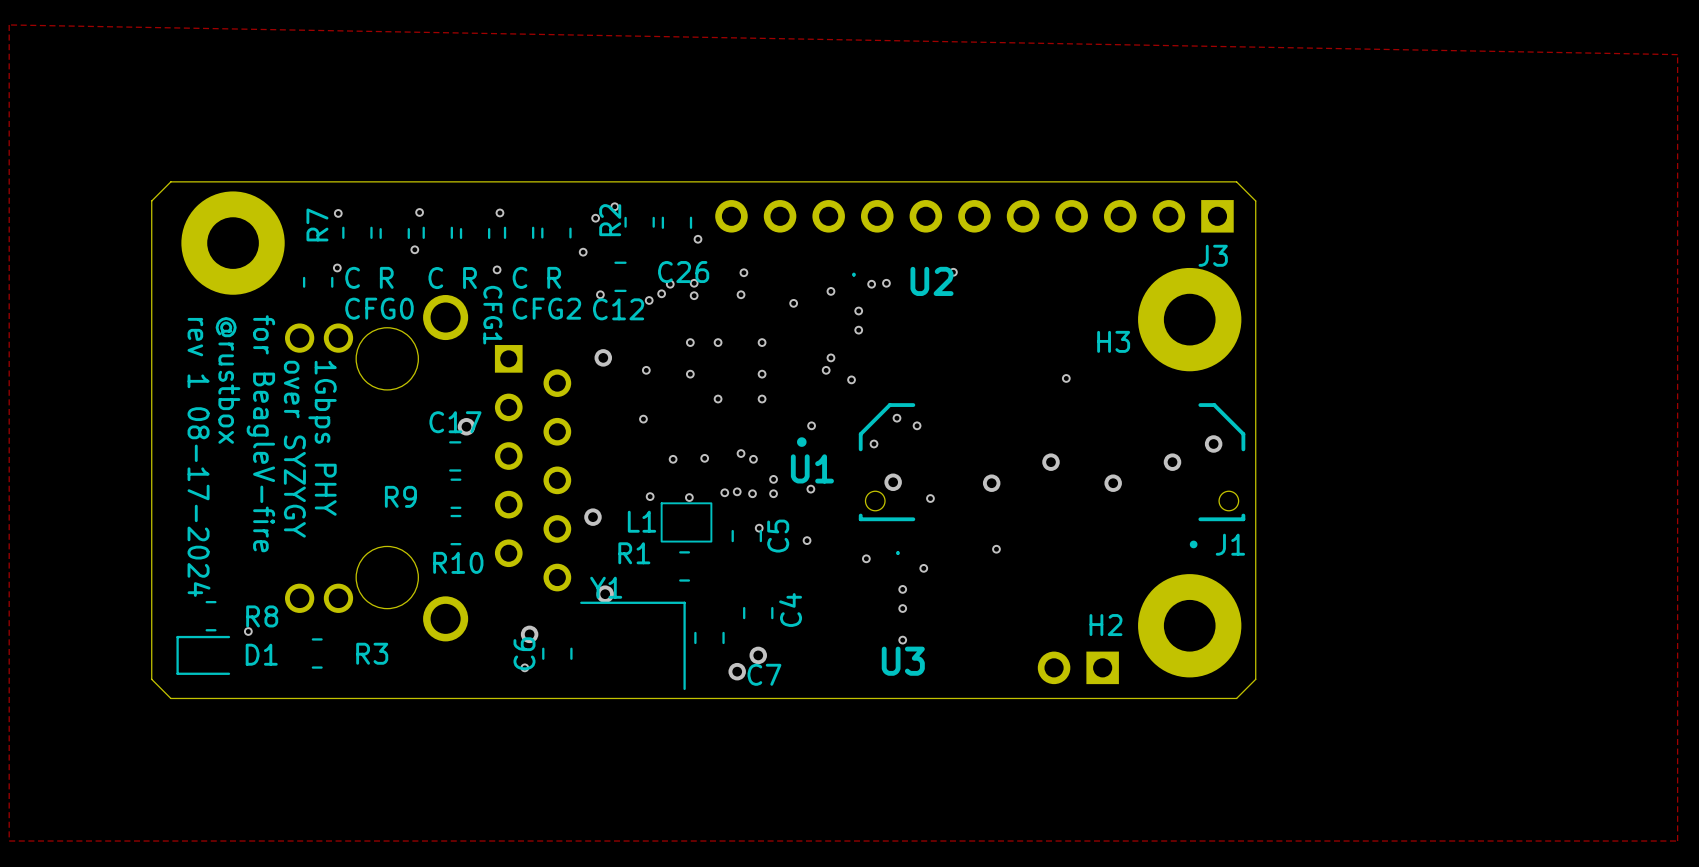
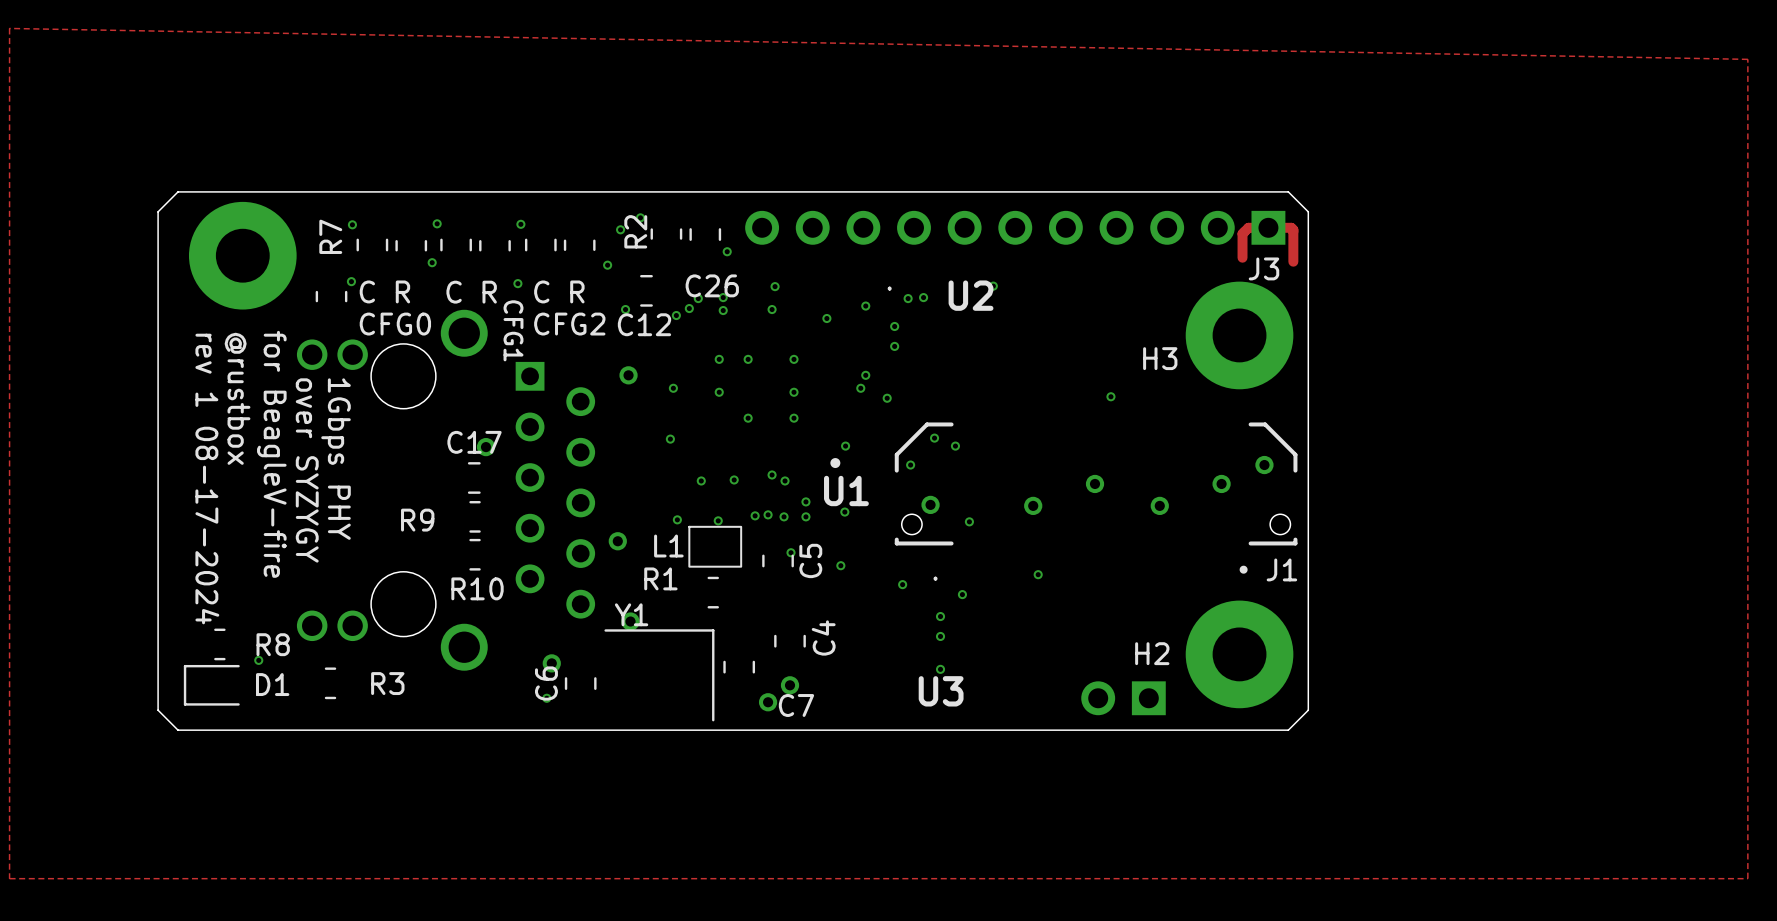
track: none -> (1242, 257) (1242, 233) (1248, 227) (1291, 227) (1293, 229) (1293, 261)

